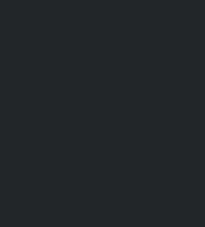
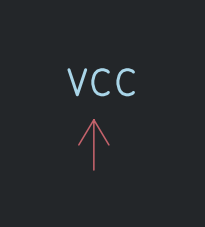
power symbol: none -> VCC (93, 144)

